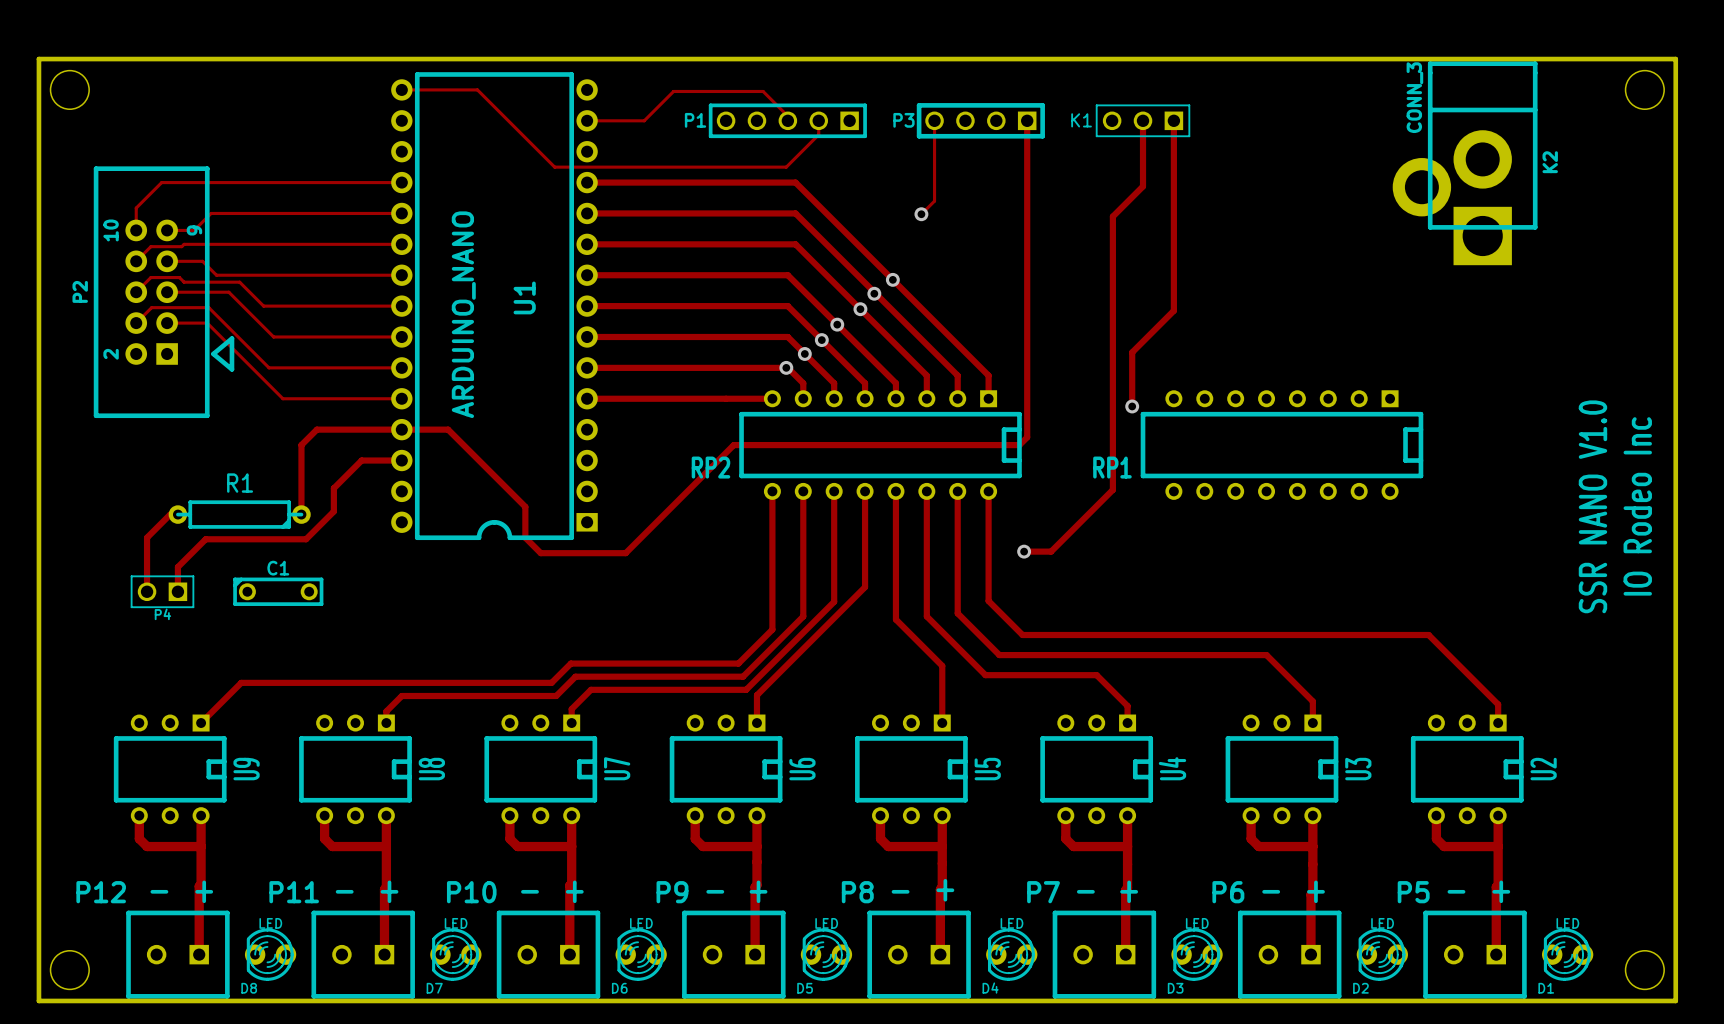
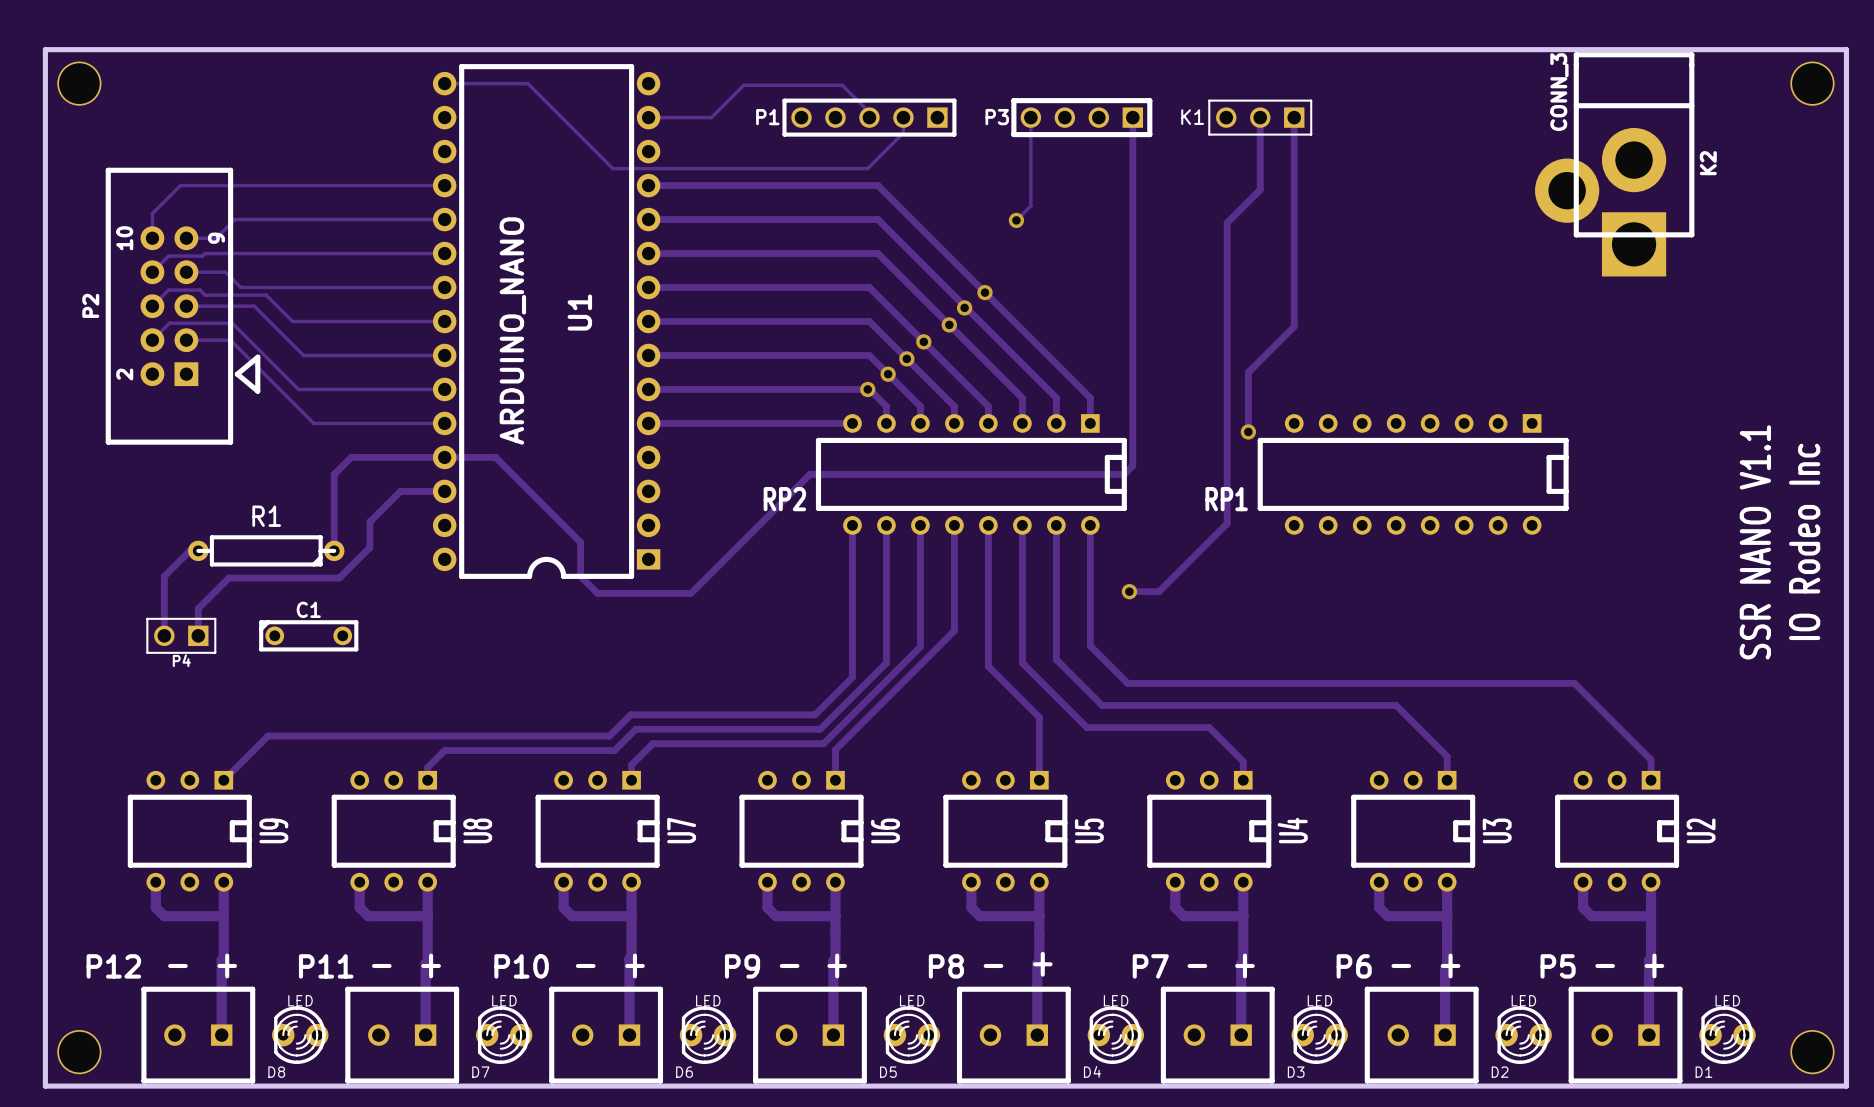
text: SSR NANO V1.0 (1592, 506) -> SSR NANO V1.1 (1755, 542)

